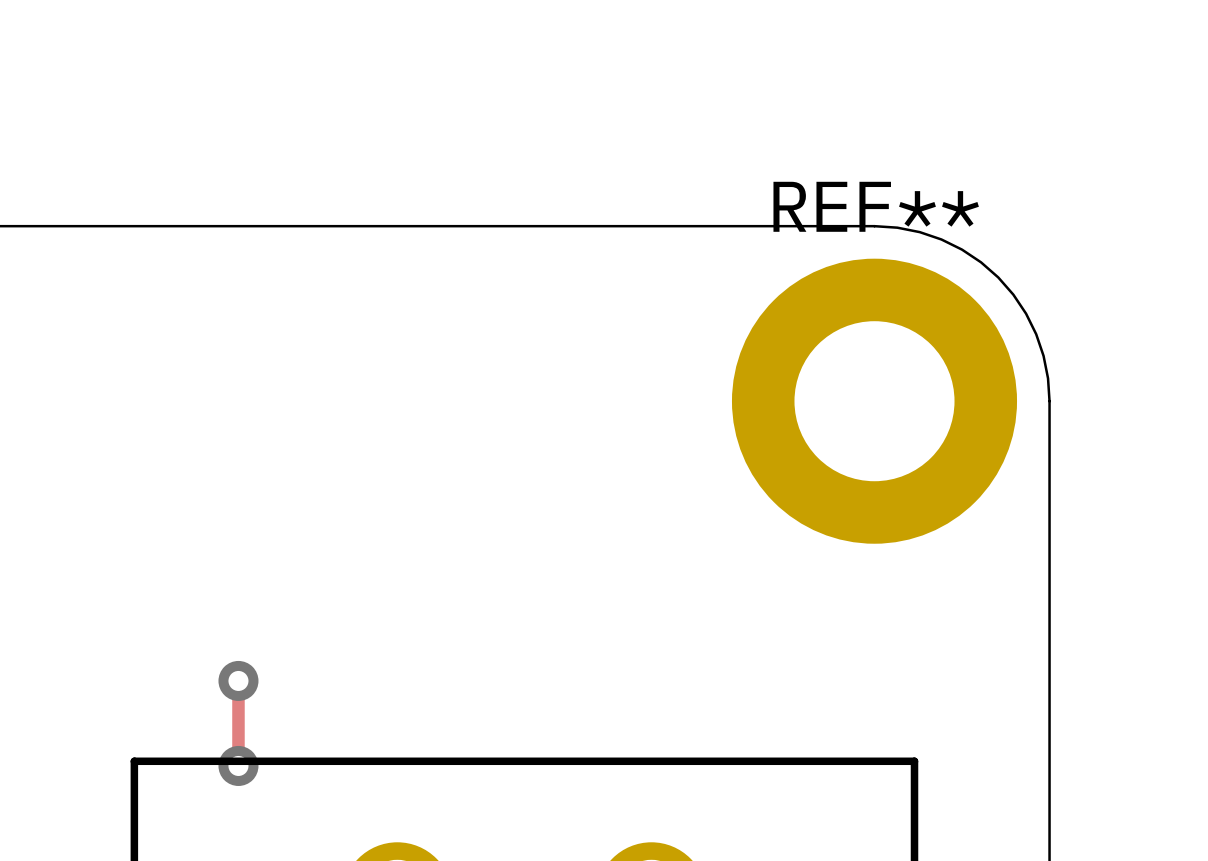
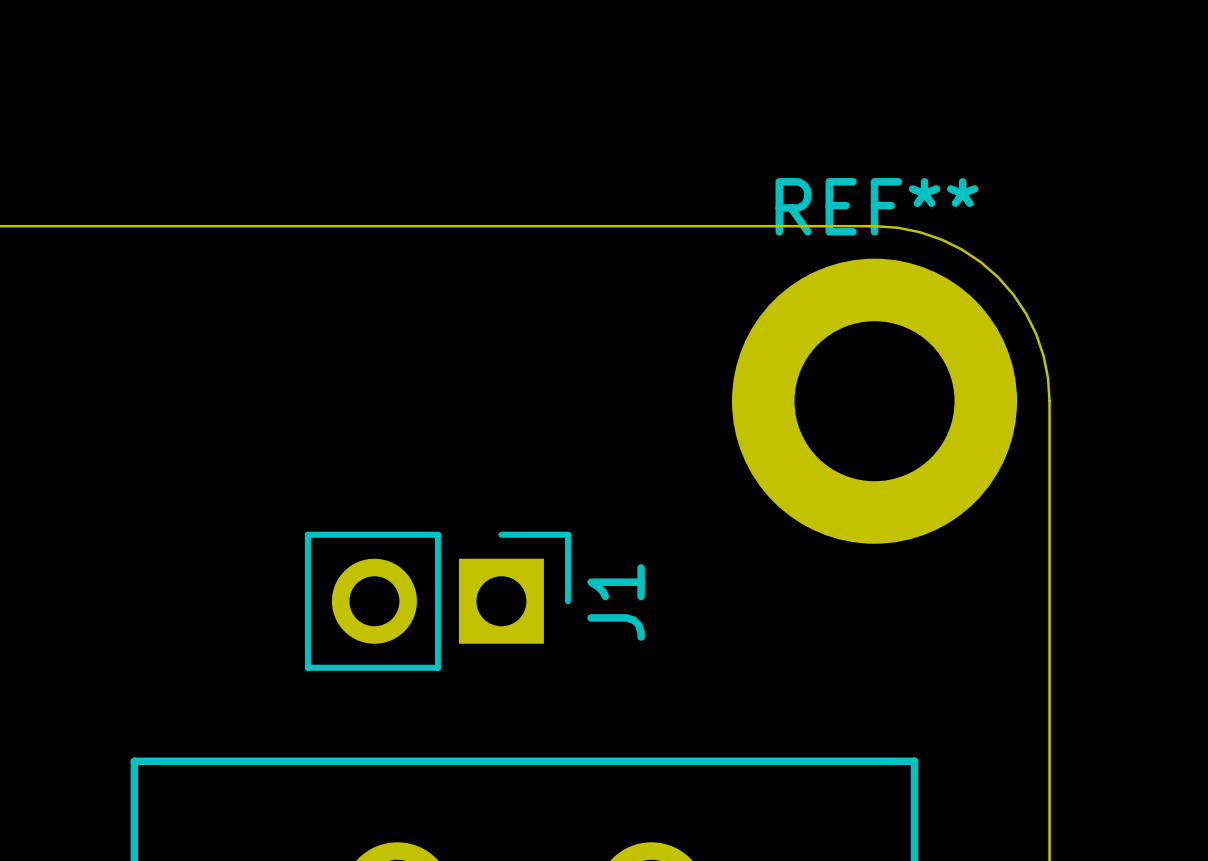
J1: none -> (437, 601)
track: (238, 680) (238, 765) -> none
via: (238, 680) -> none
via: (238, 765) -> none

